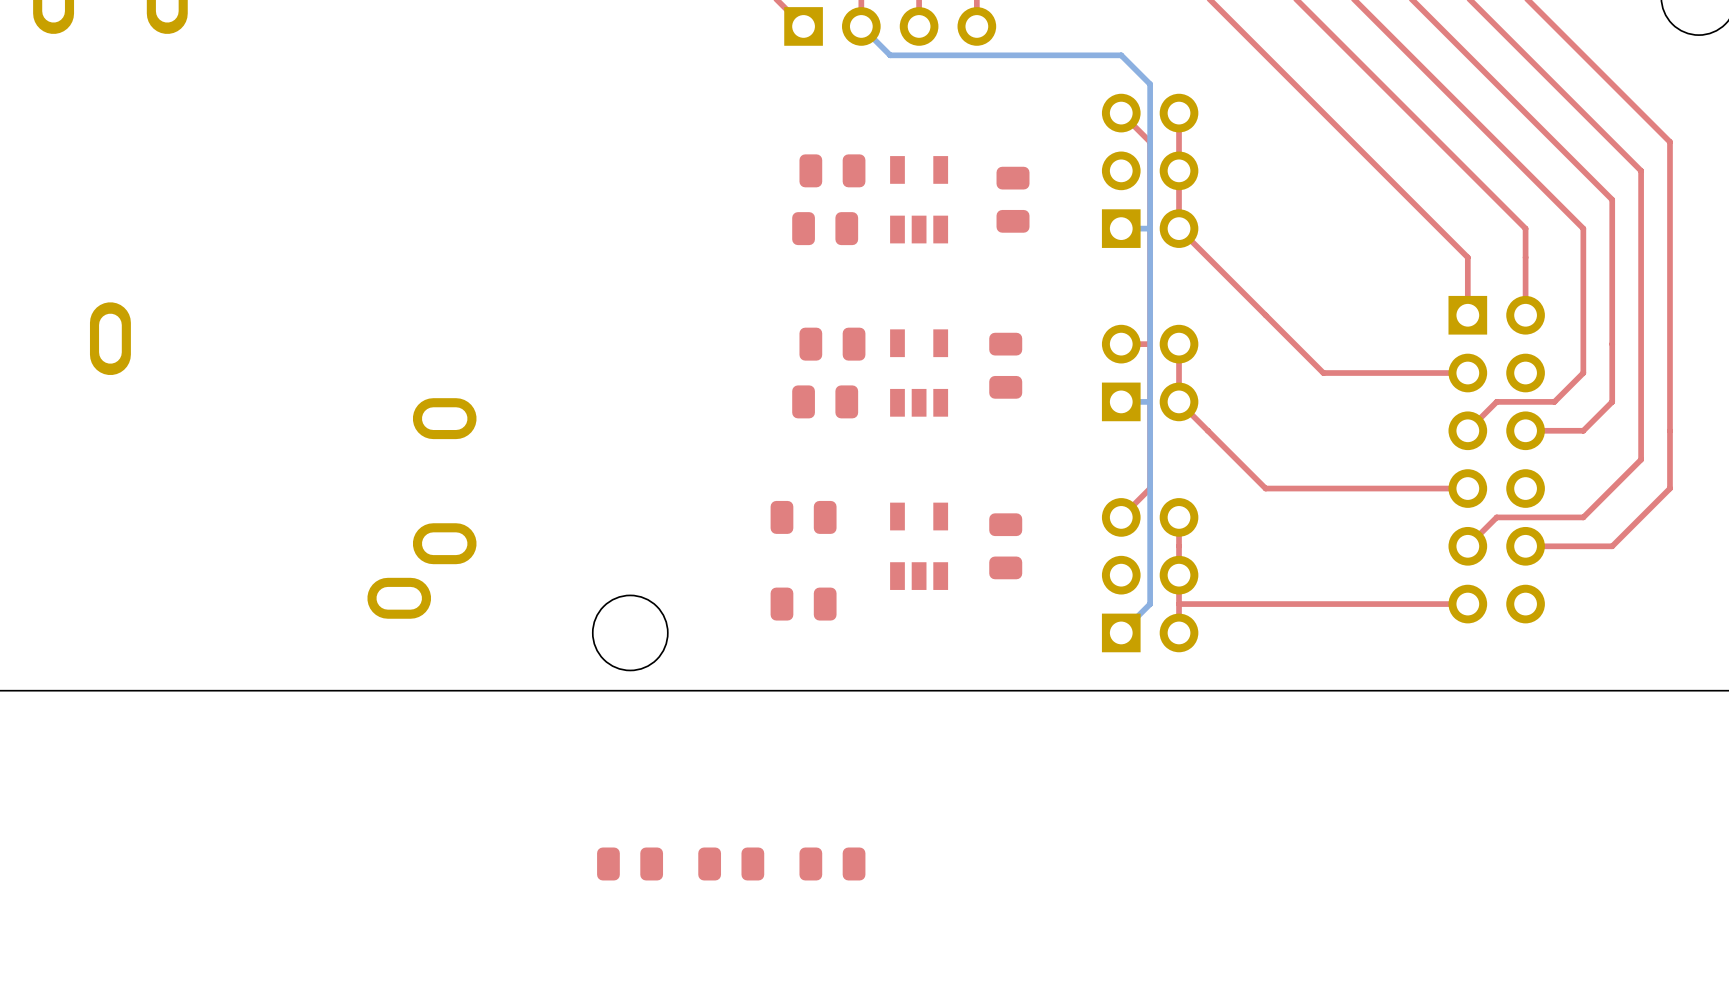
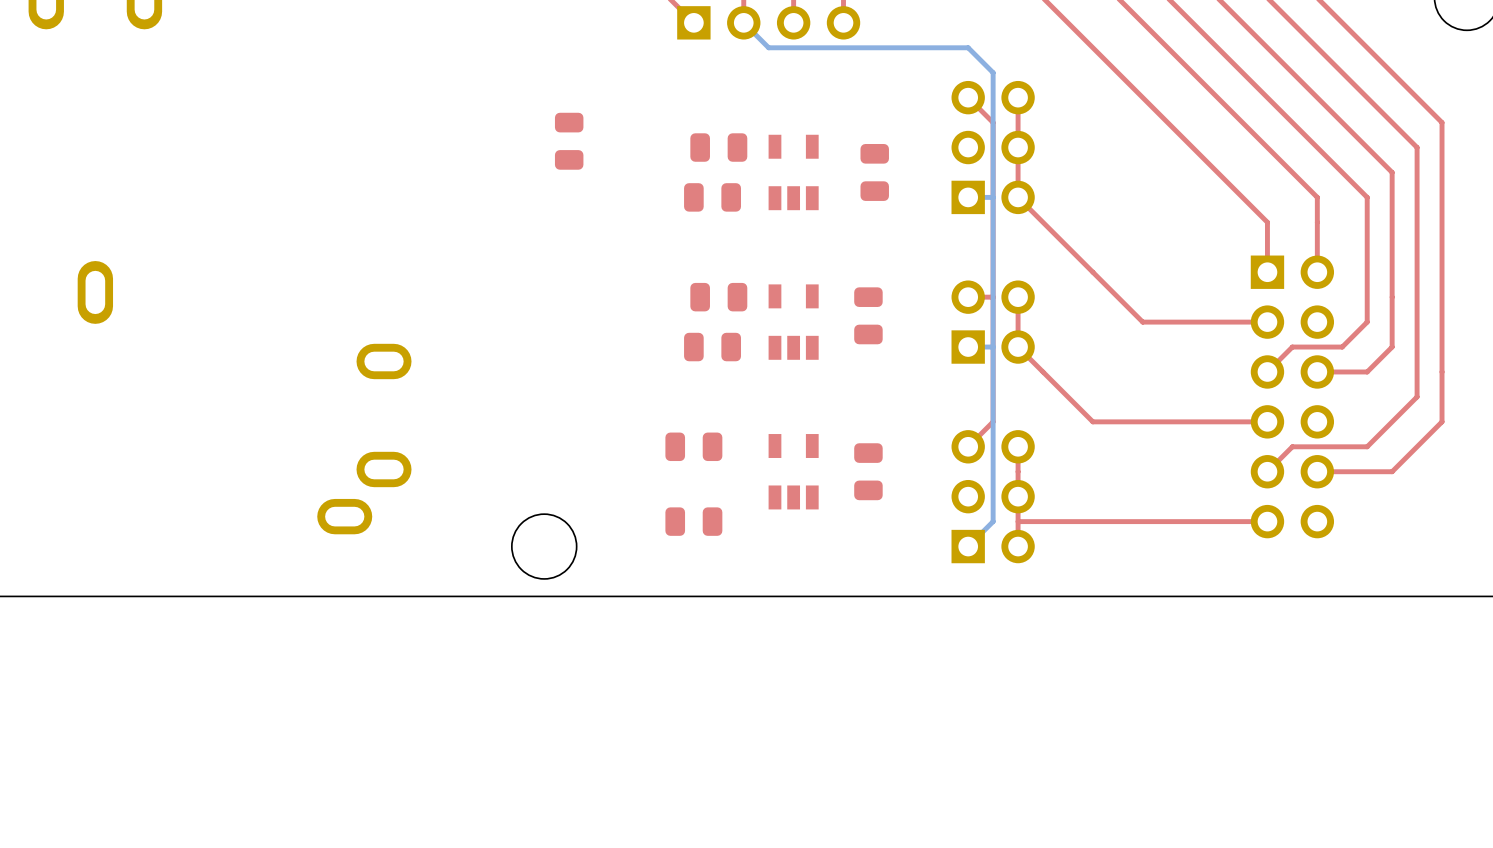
part: none -> (569, 141)
part: (630, 863) -> none
part: (731, 863) -> none
part: (832, 863) -> none

